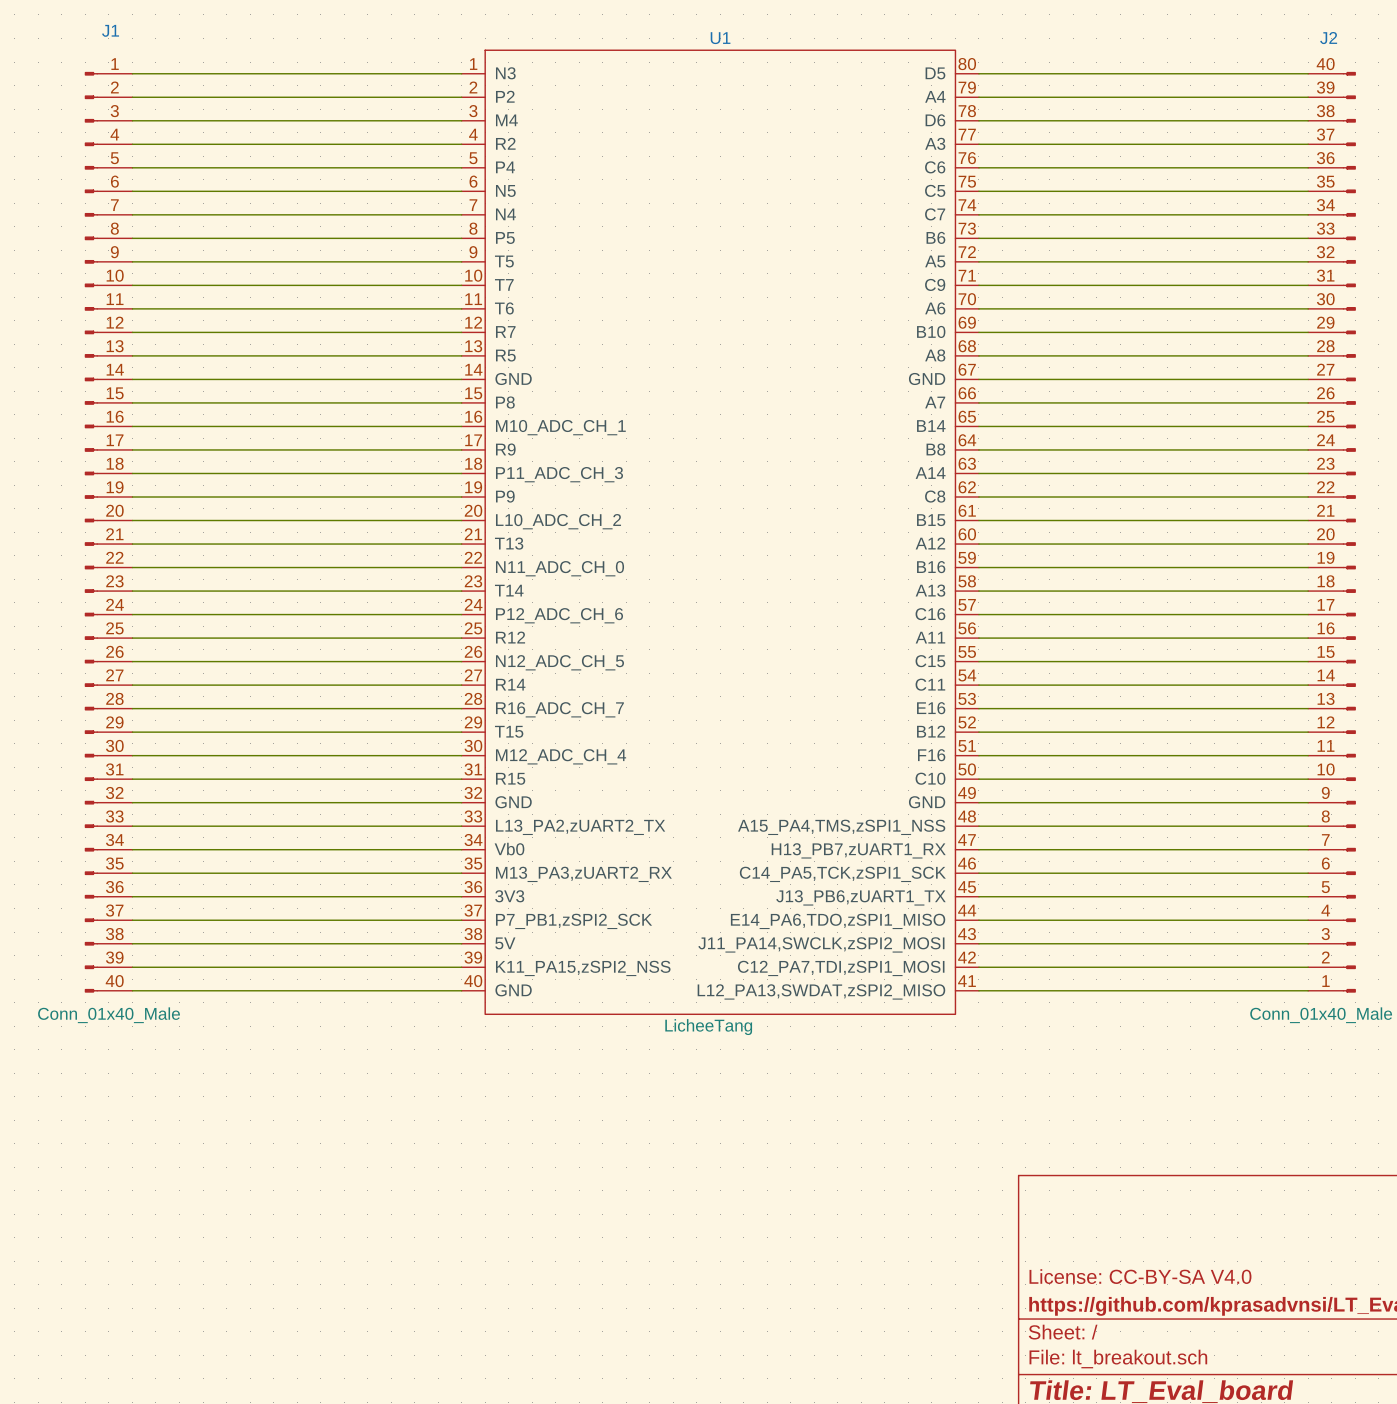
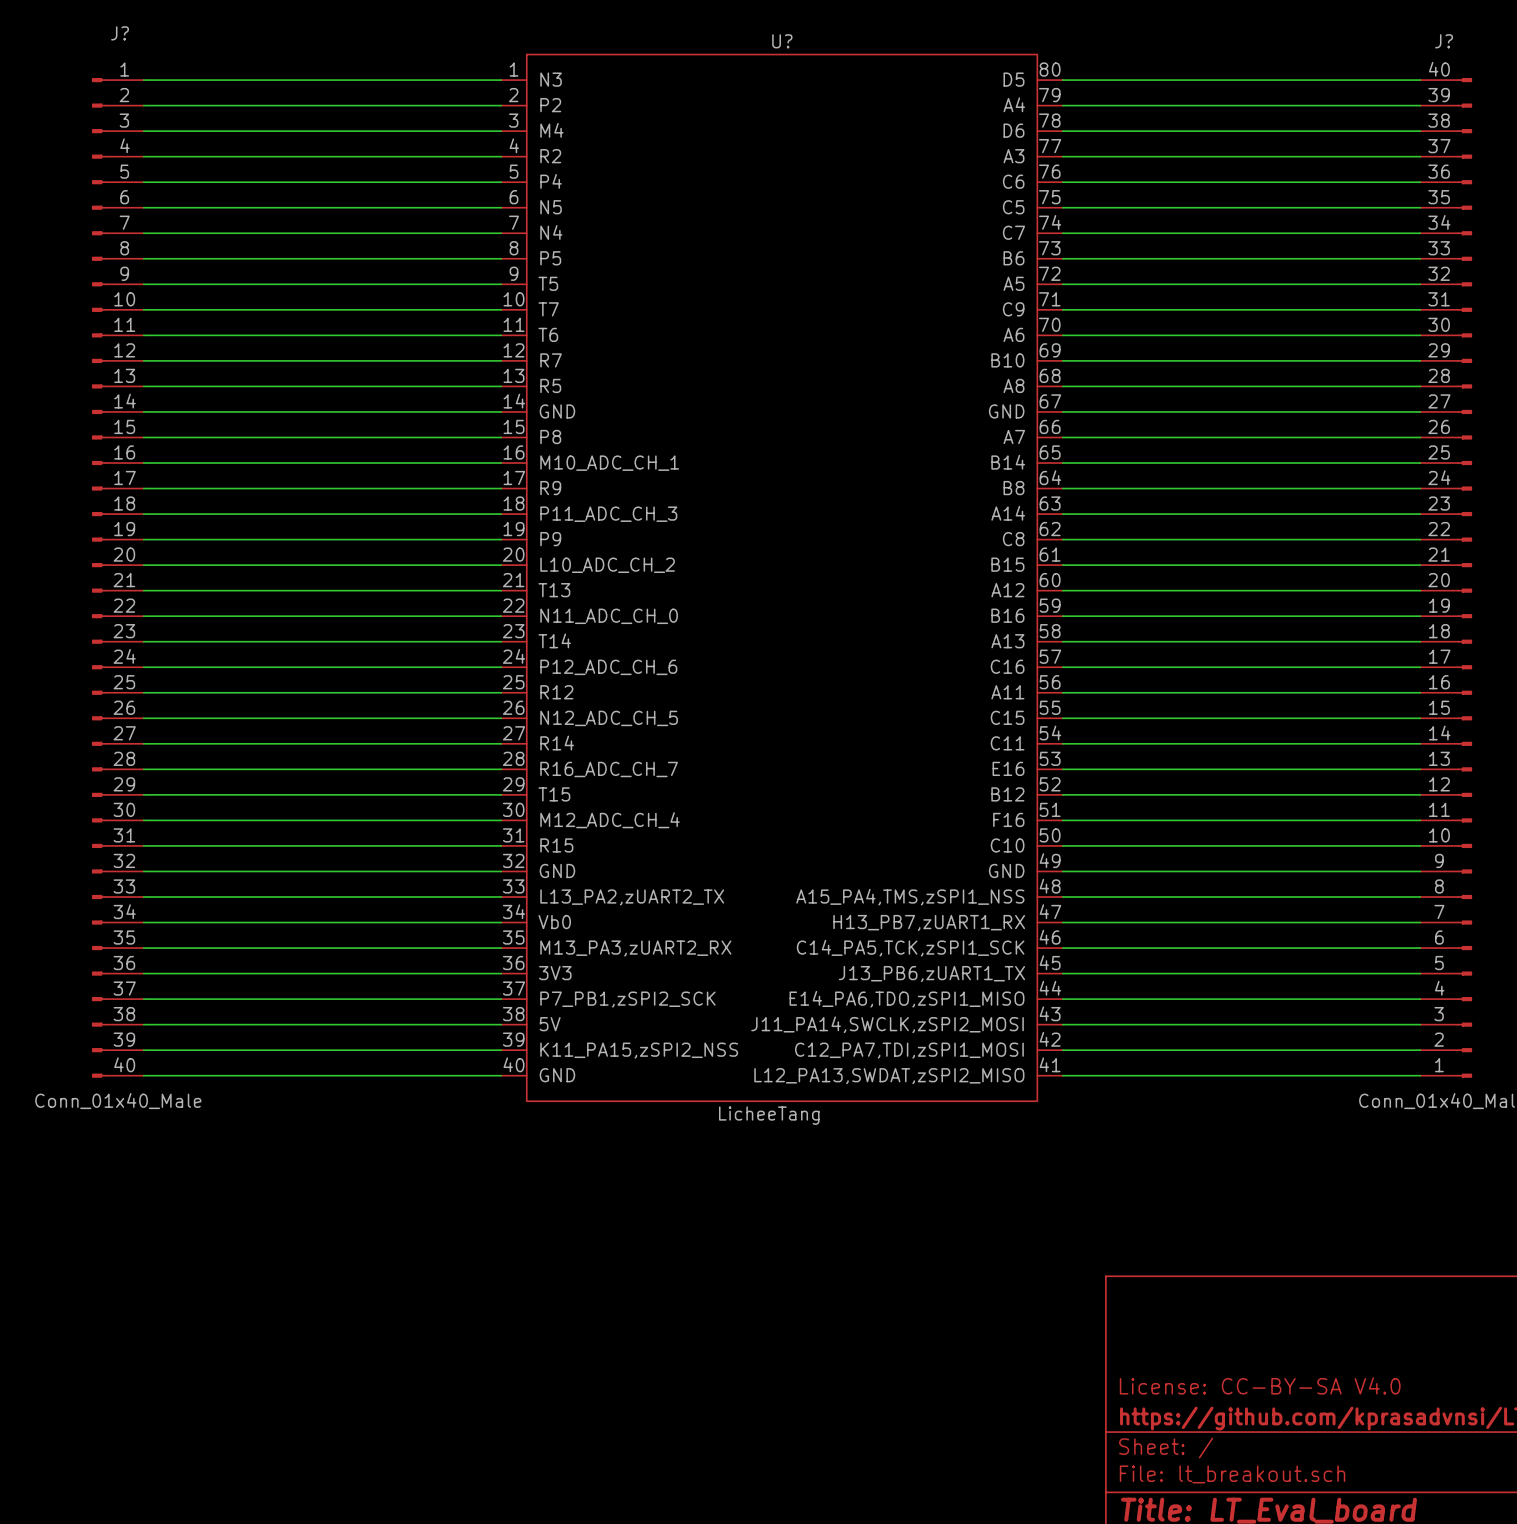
J1 name: J1 (110, 30) -> J? (120, 33)
U1 name: U1 (720, 38) -> U? (782, 41)
J2 name: J2 (1328, 38) -> J? (1444, 41)

